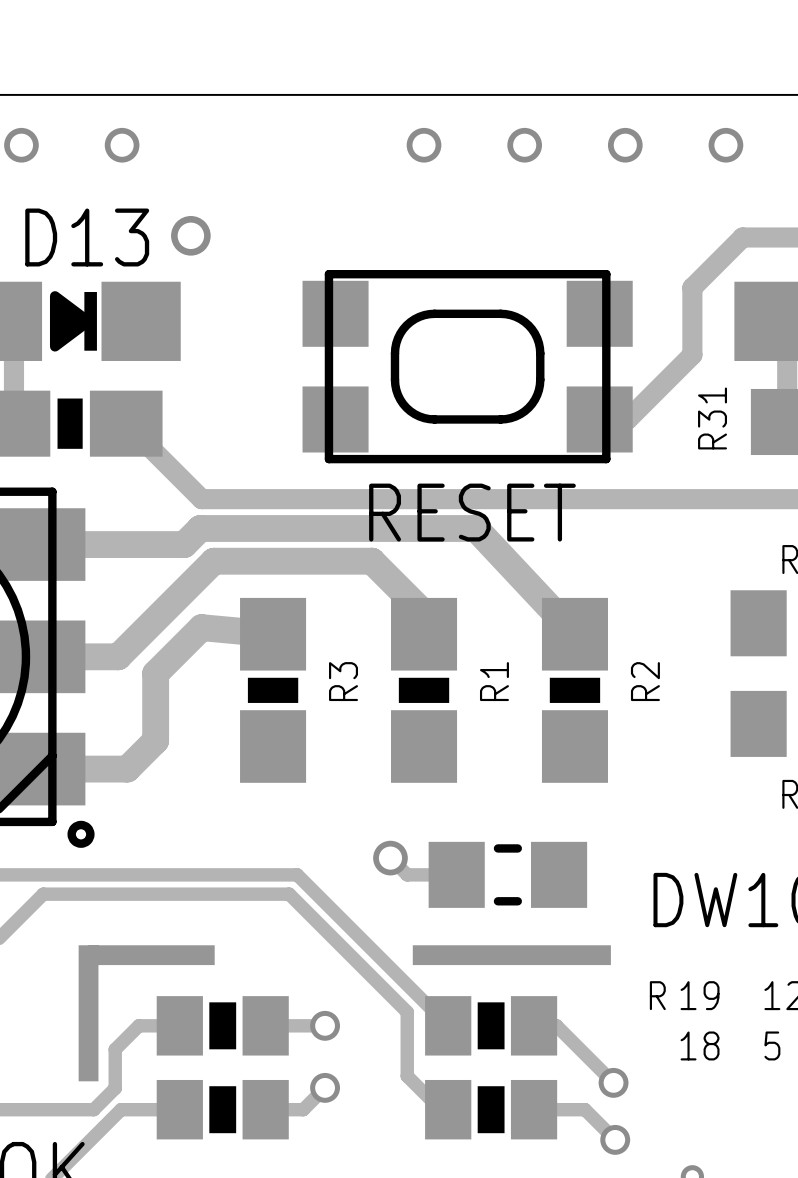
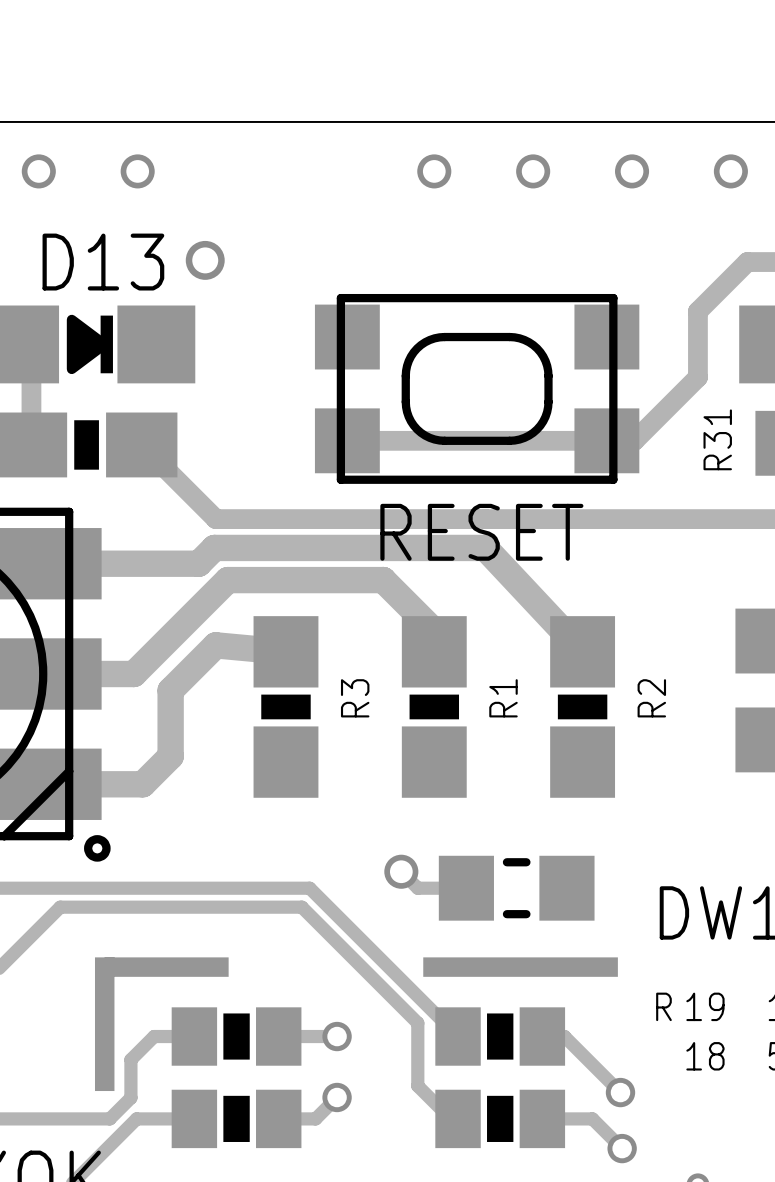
track: none -> (347, 440) (606, 440)

